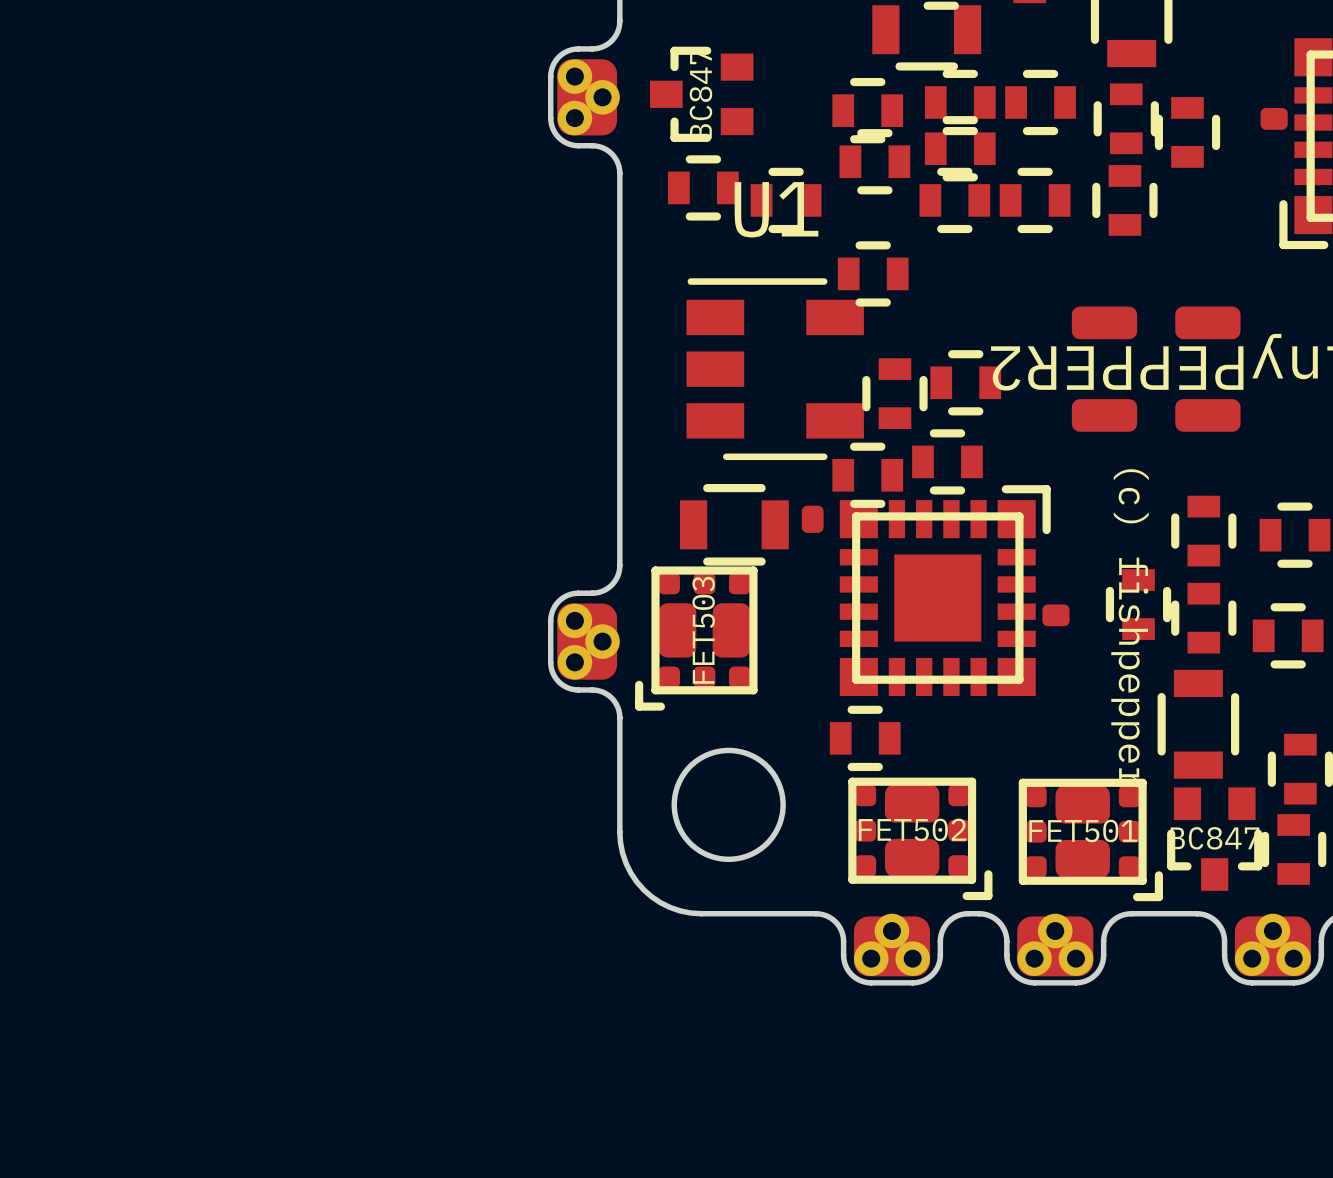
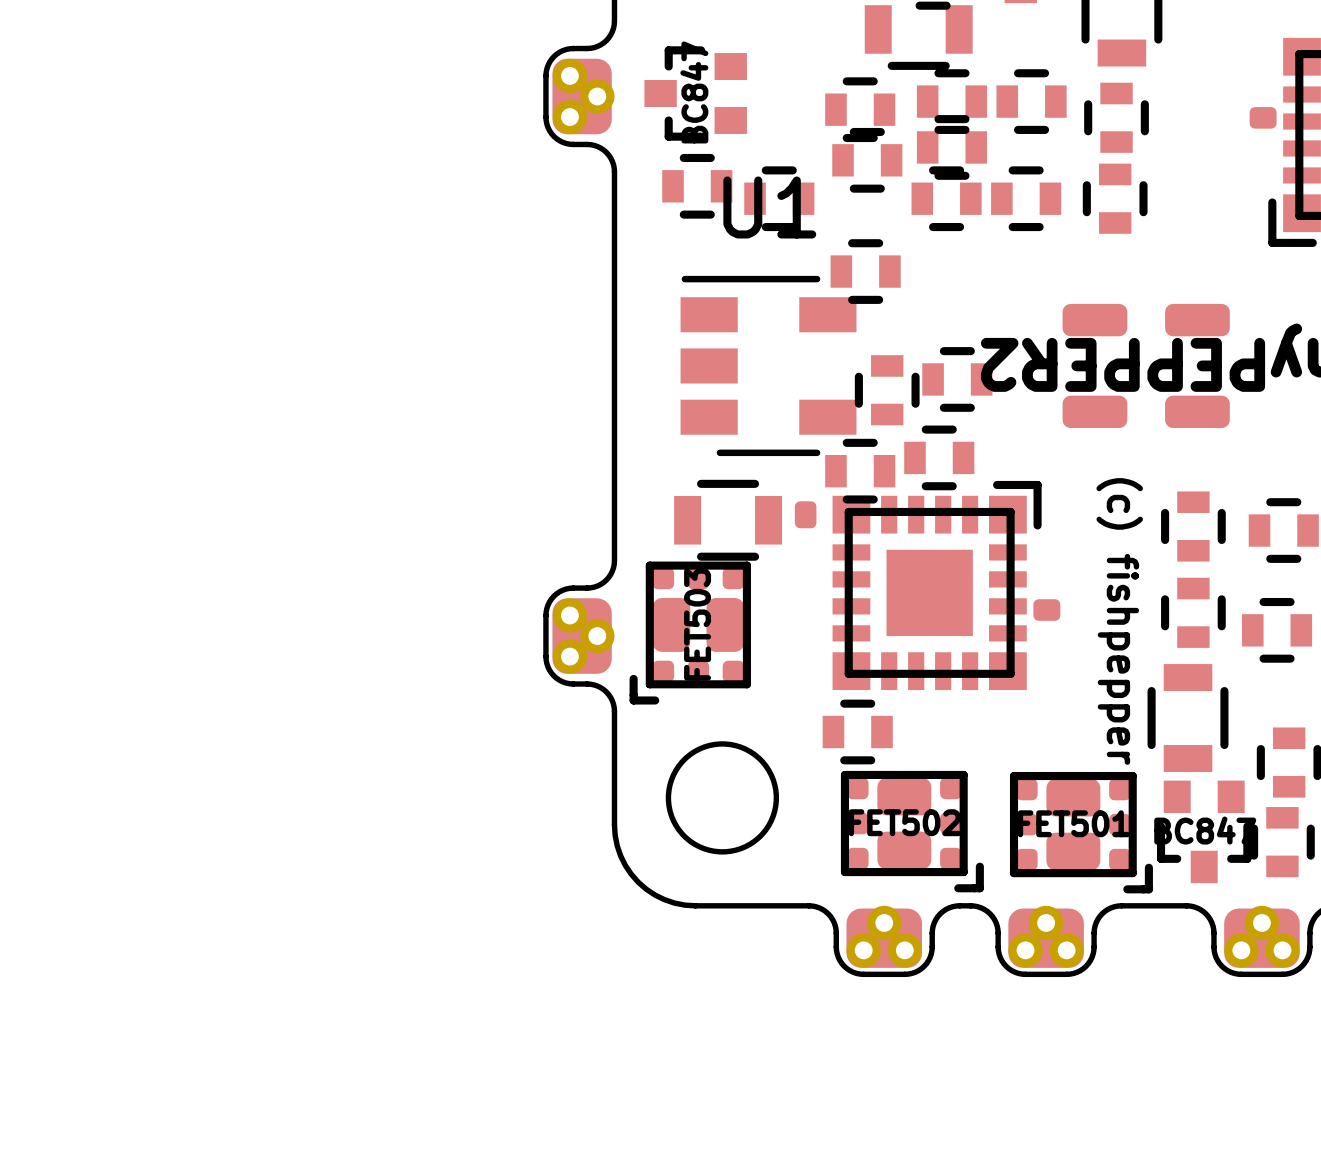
part: (1187, 132) -> none
part: (1138, 604) -> none

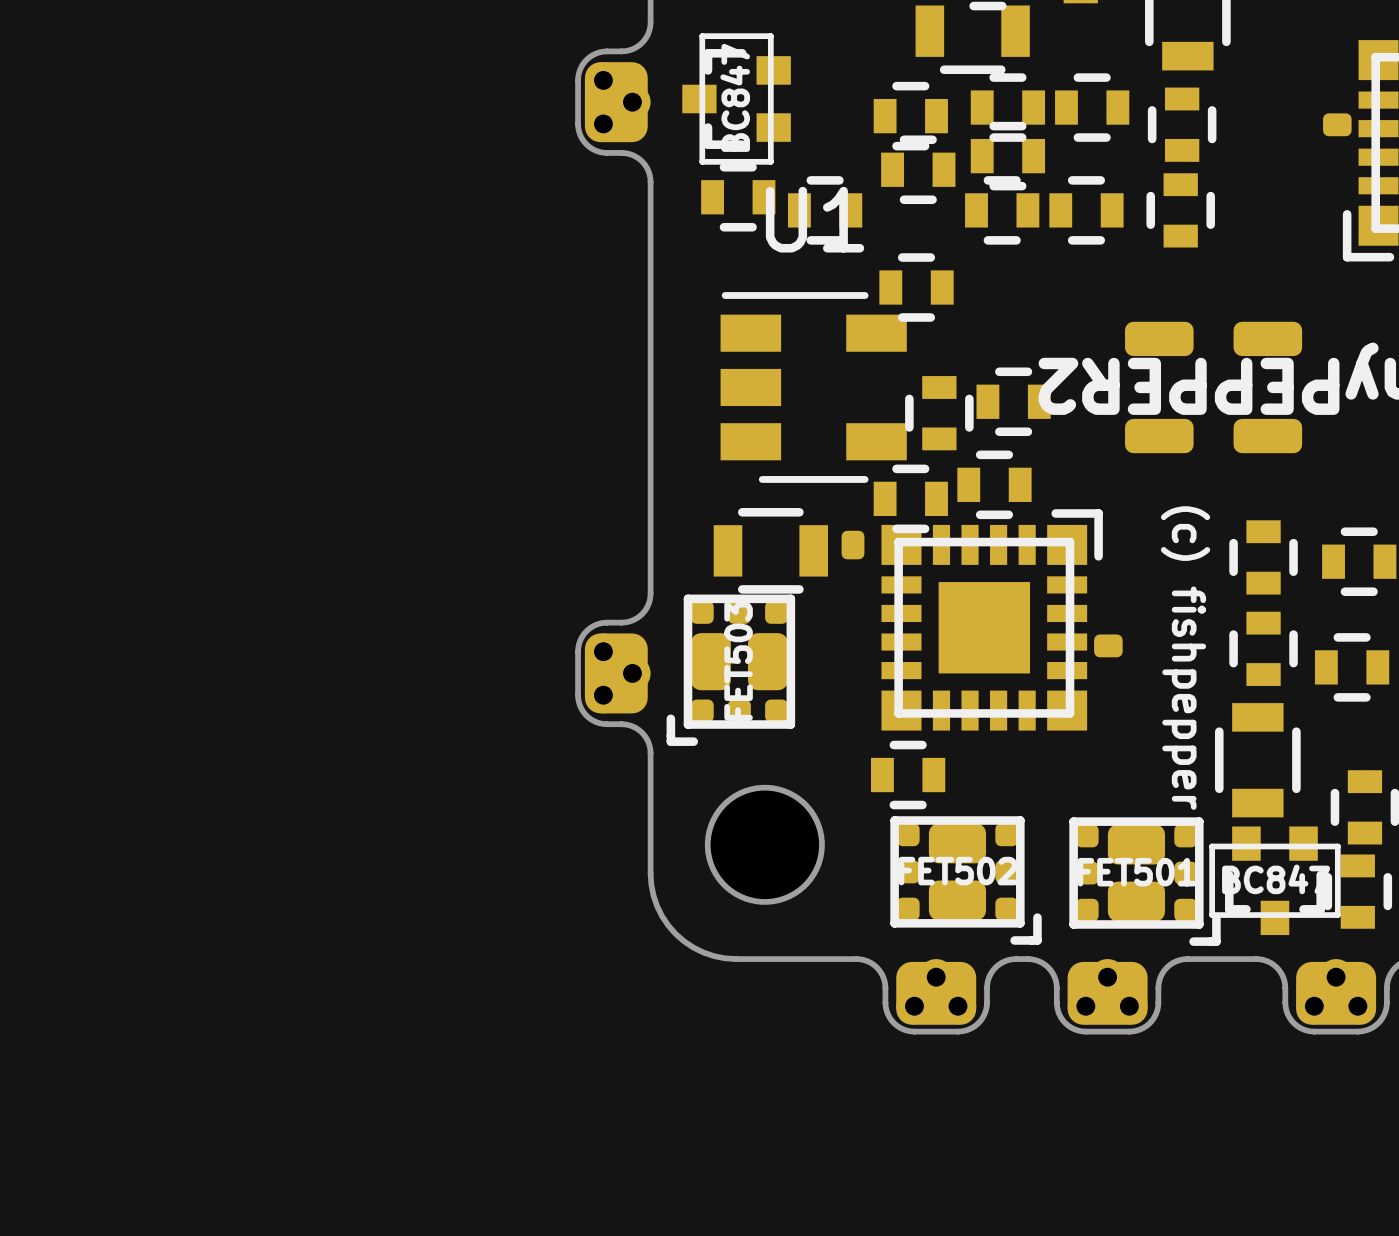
part footprint: [644, 46, 747, 141] -> [682, 33, 791, 165]
part footprint: [1156, 780, 1252, 884] -> [1209, 826, 1341, 936]

